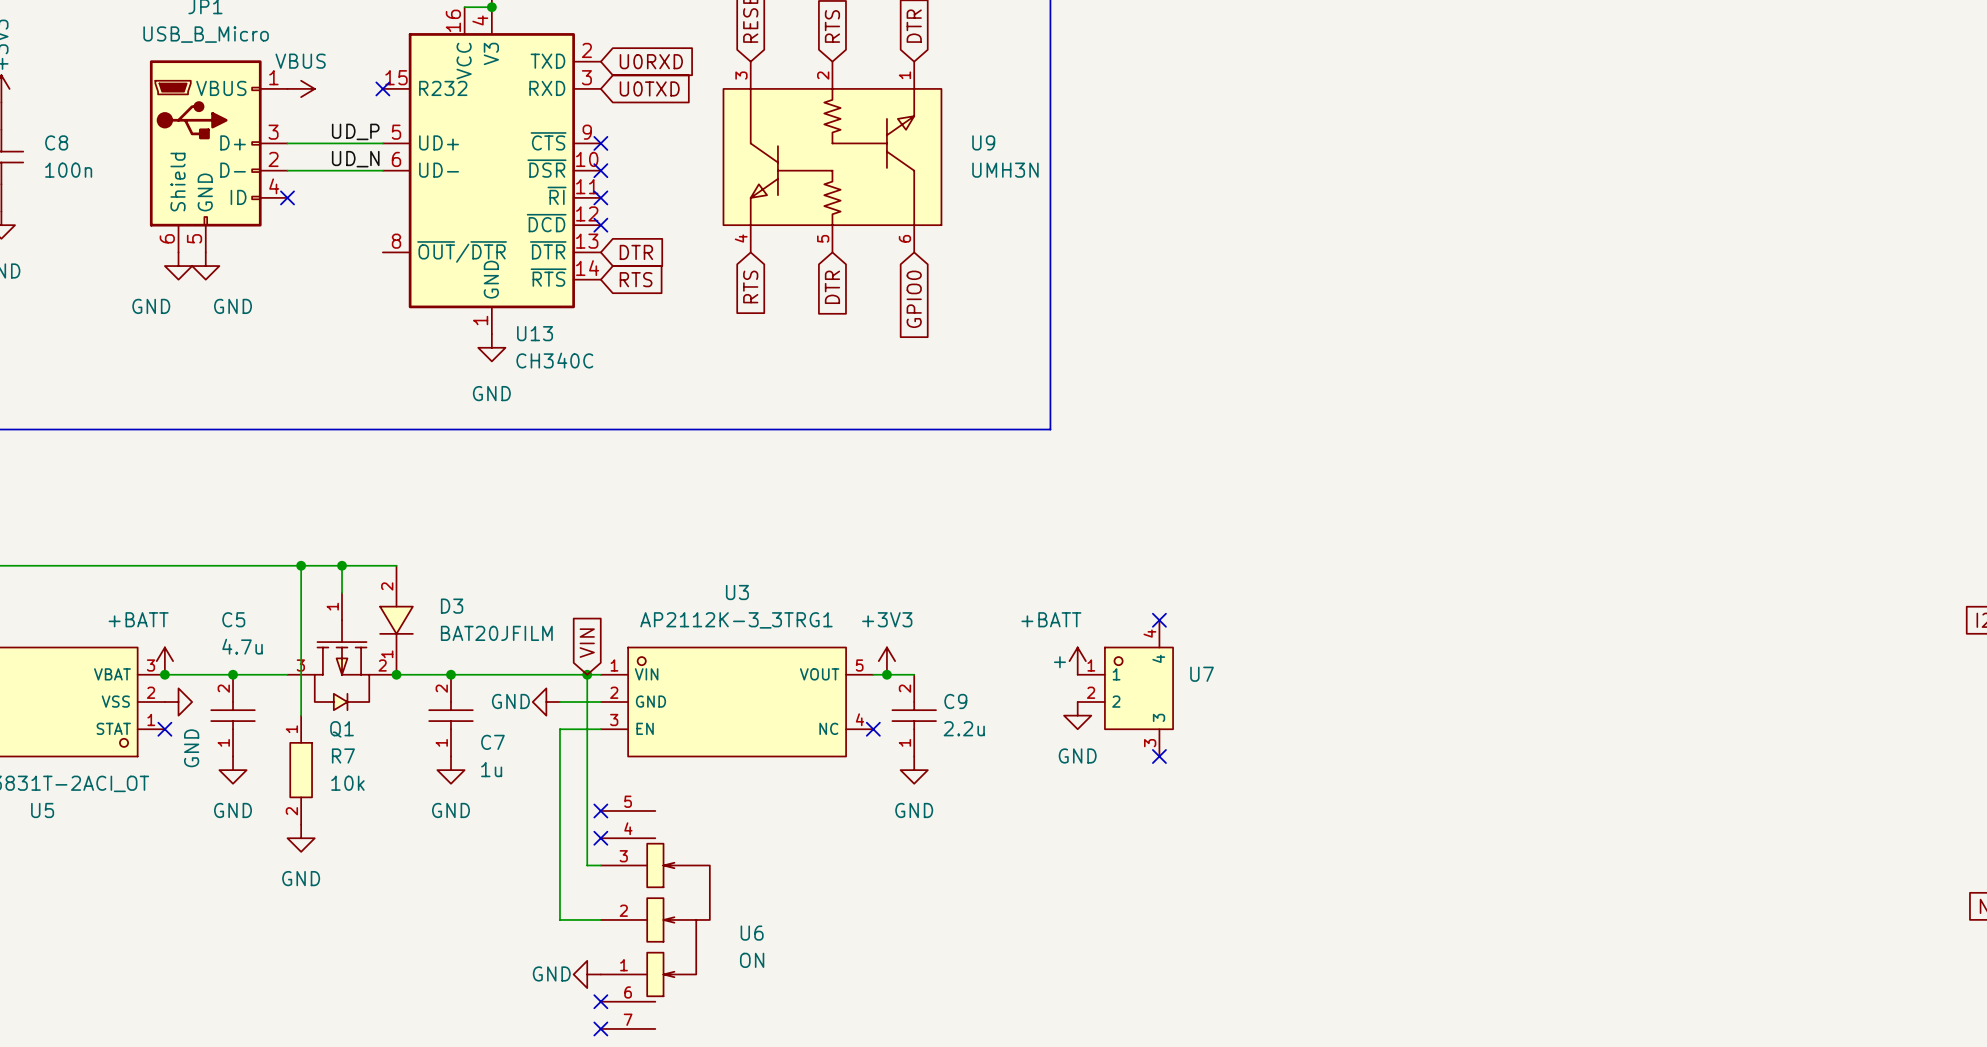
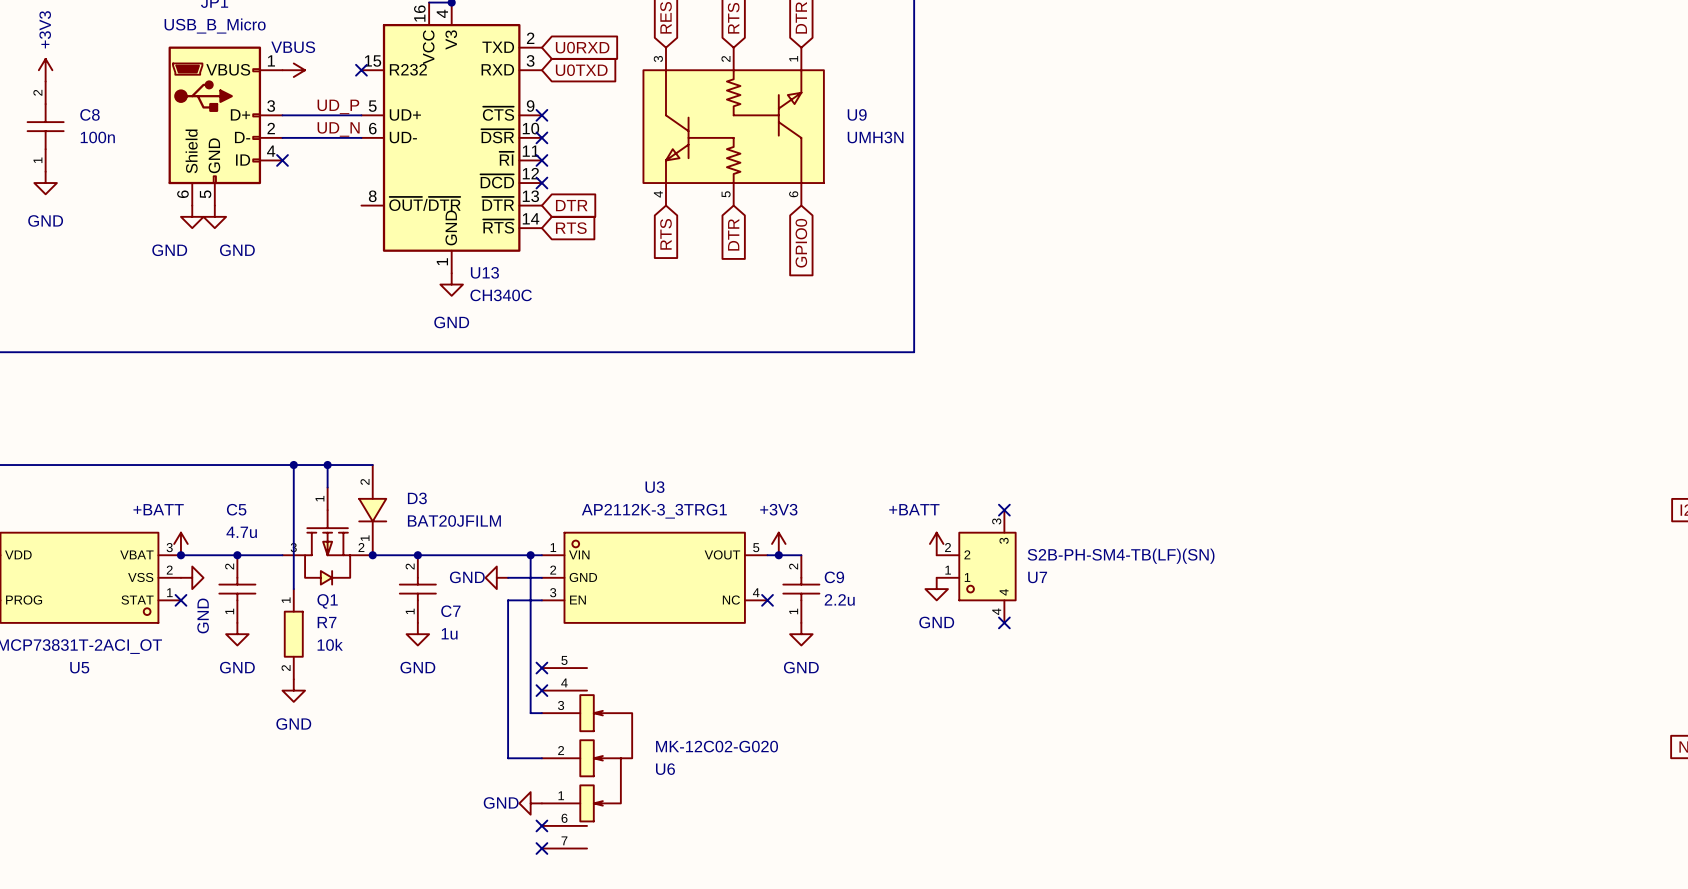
global label: VIN (587, 643) -> none
U7 value: + (1059, 662) -> S2B-PH-SM4-TB(LF)(SN) (1121, 556)
U7 flip: as is (1138, 688) -> up-down (987, 566)
U6 value: ON (752, 960) -> MK-12C02-G020 (717, 746)

